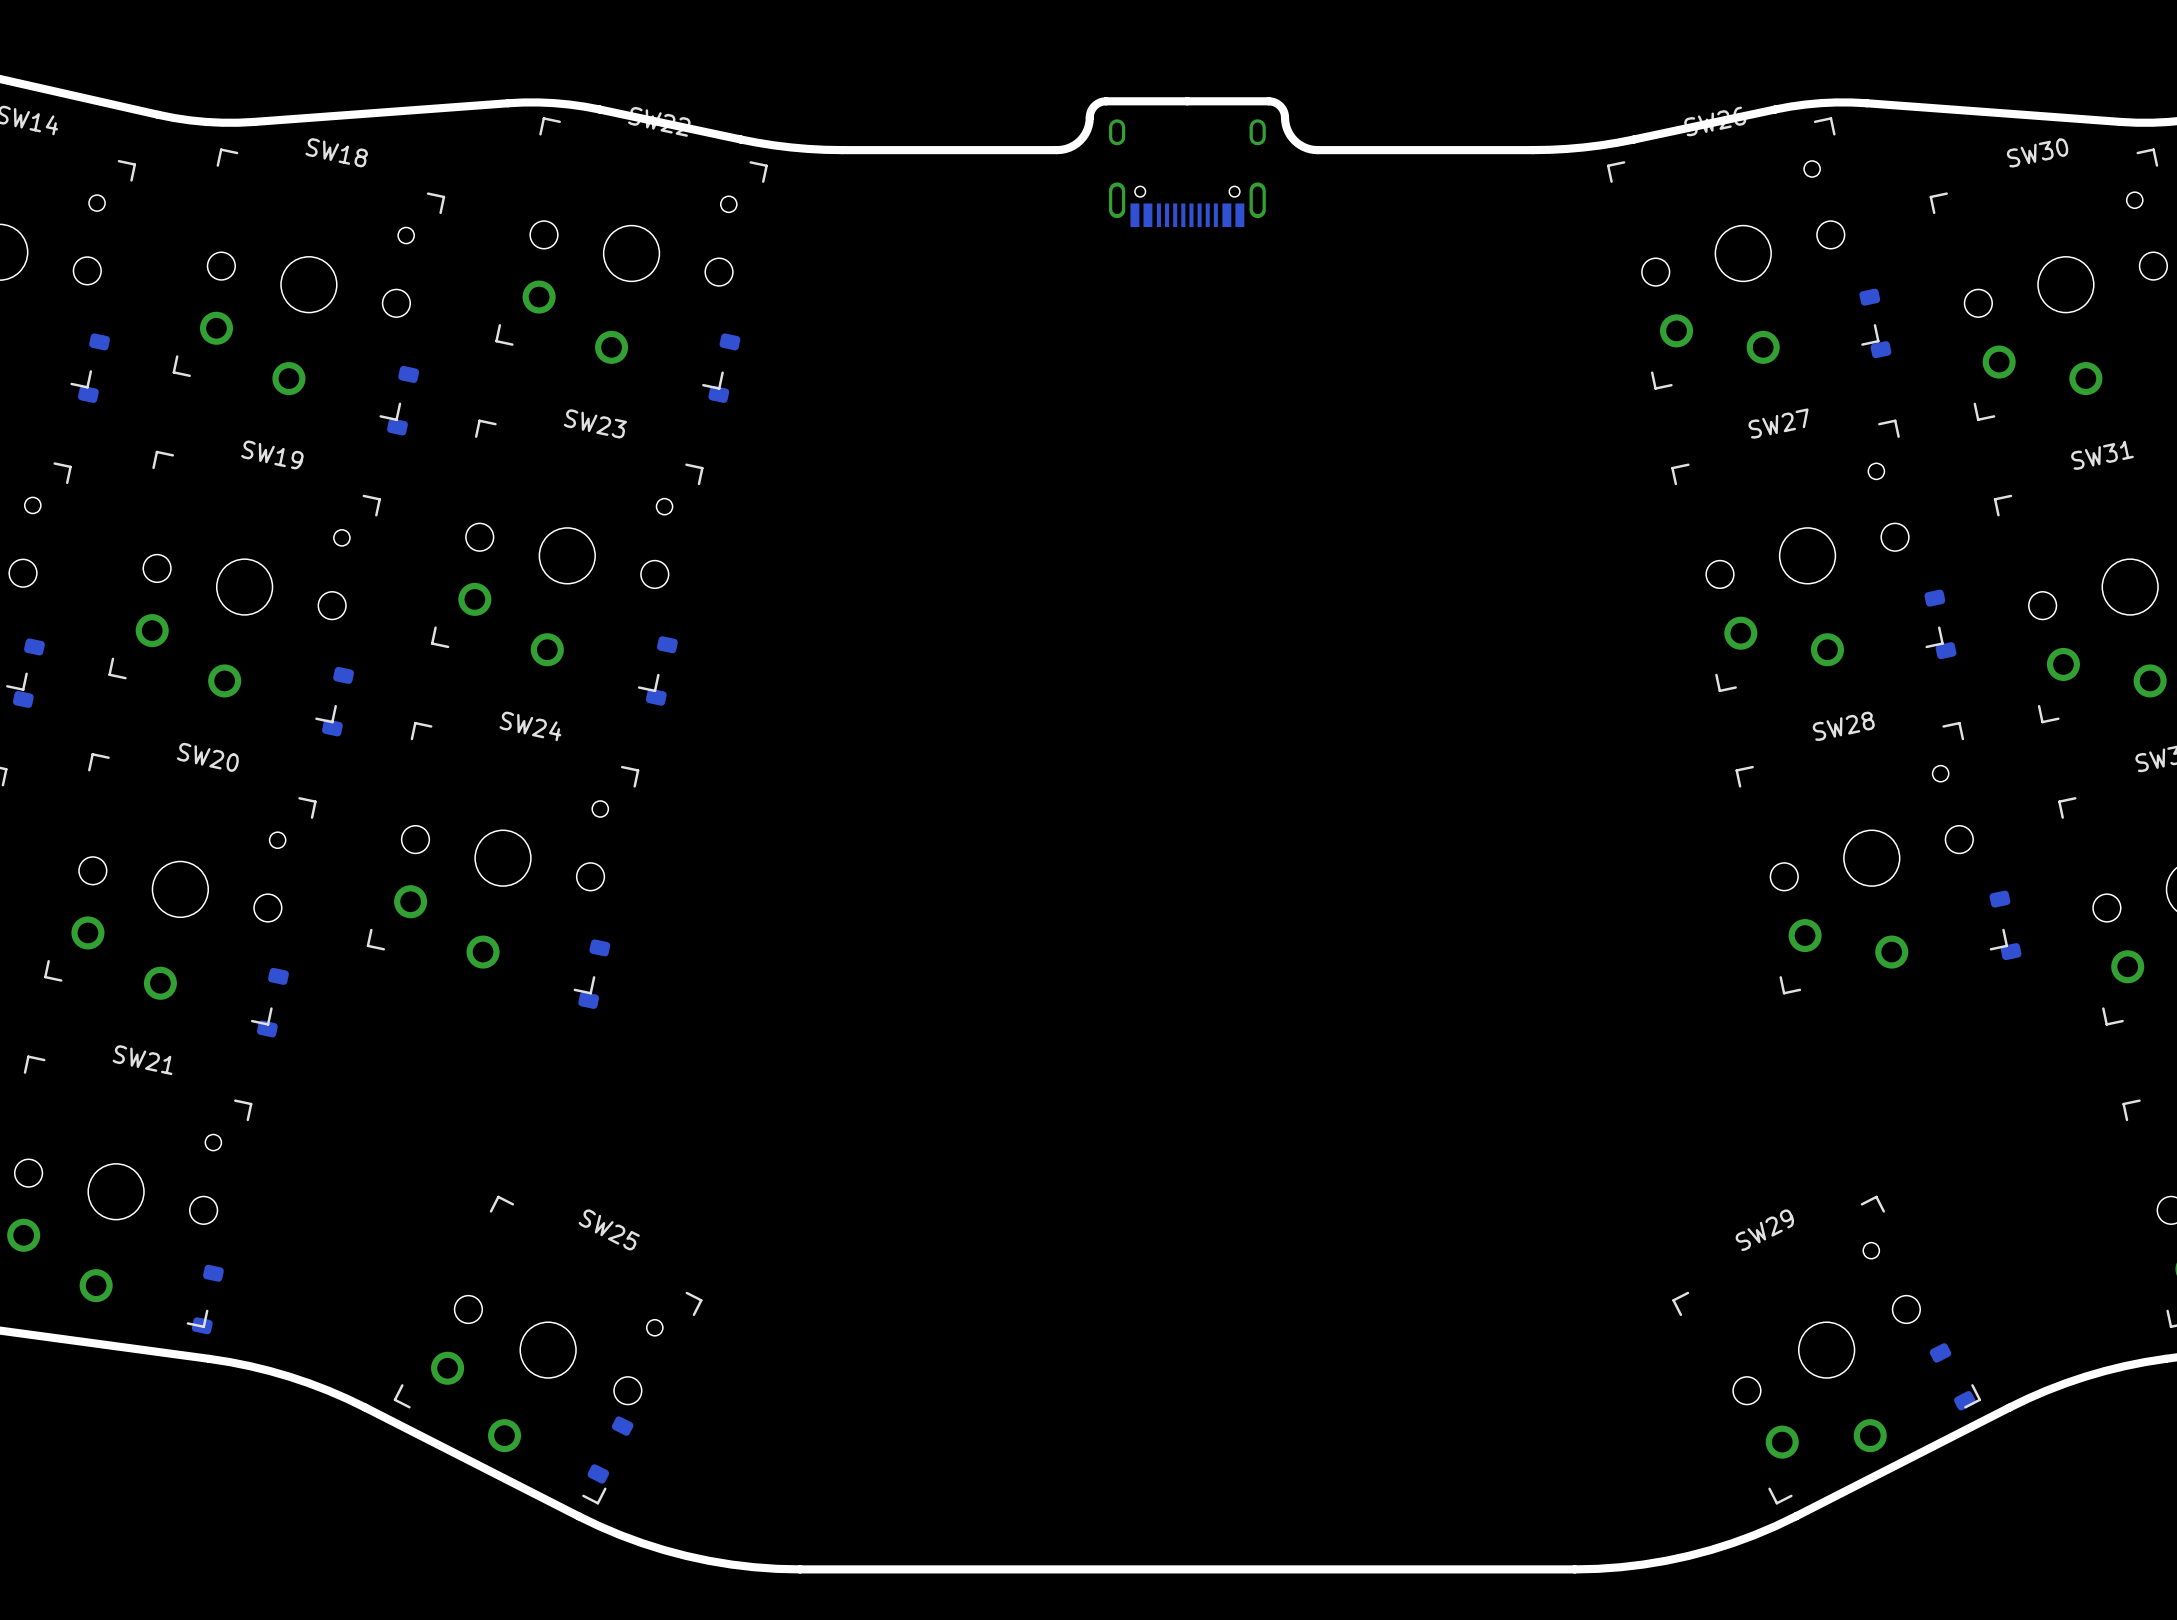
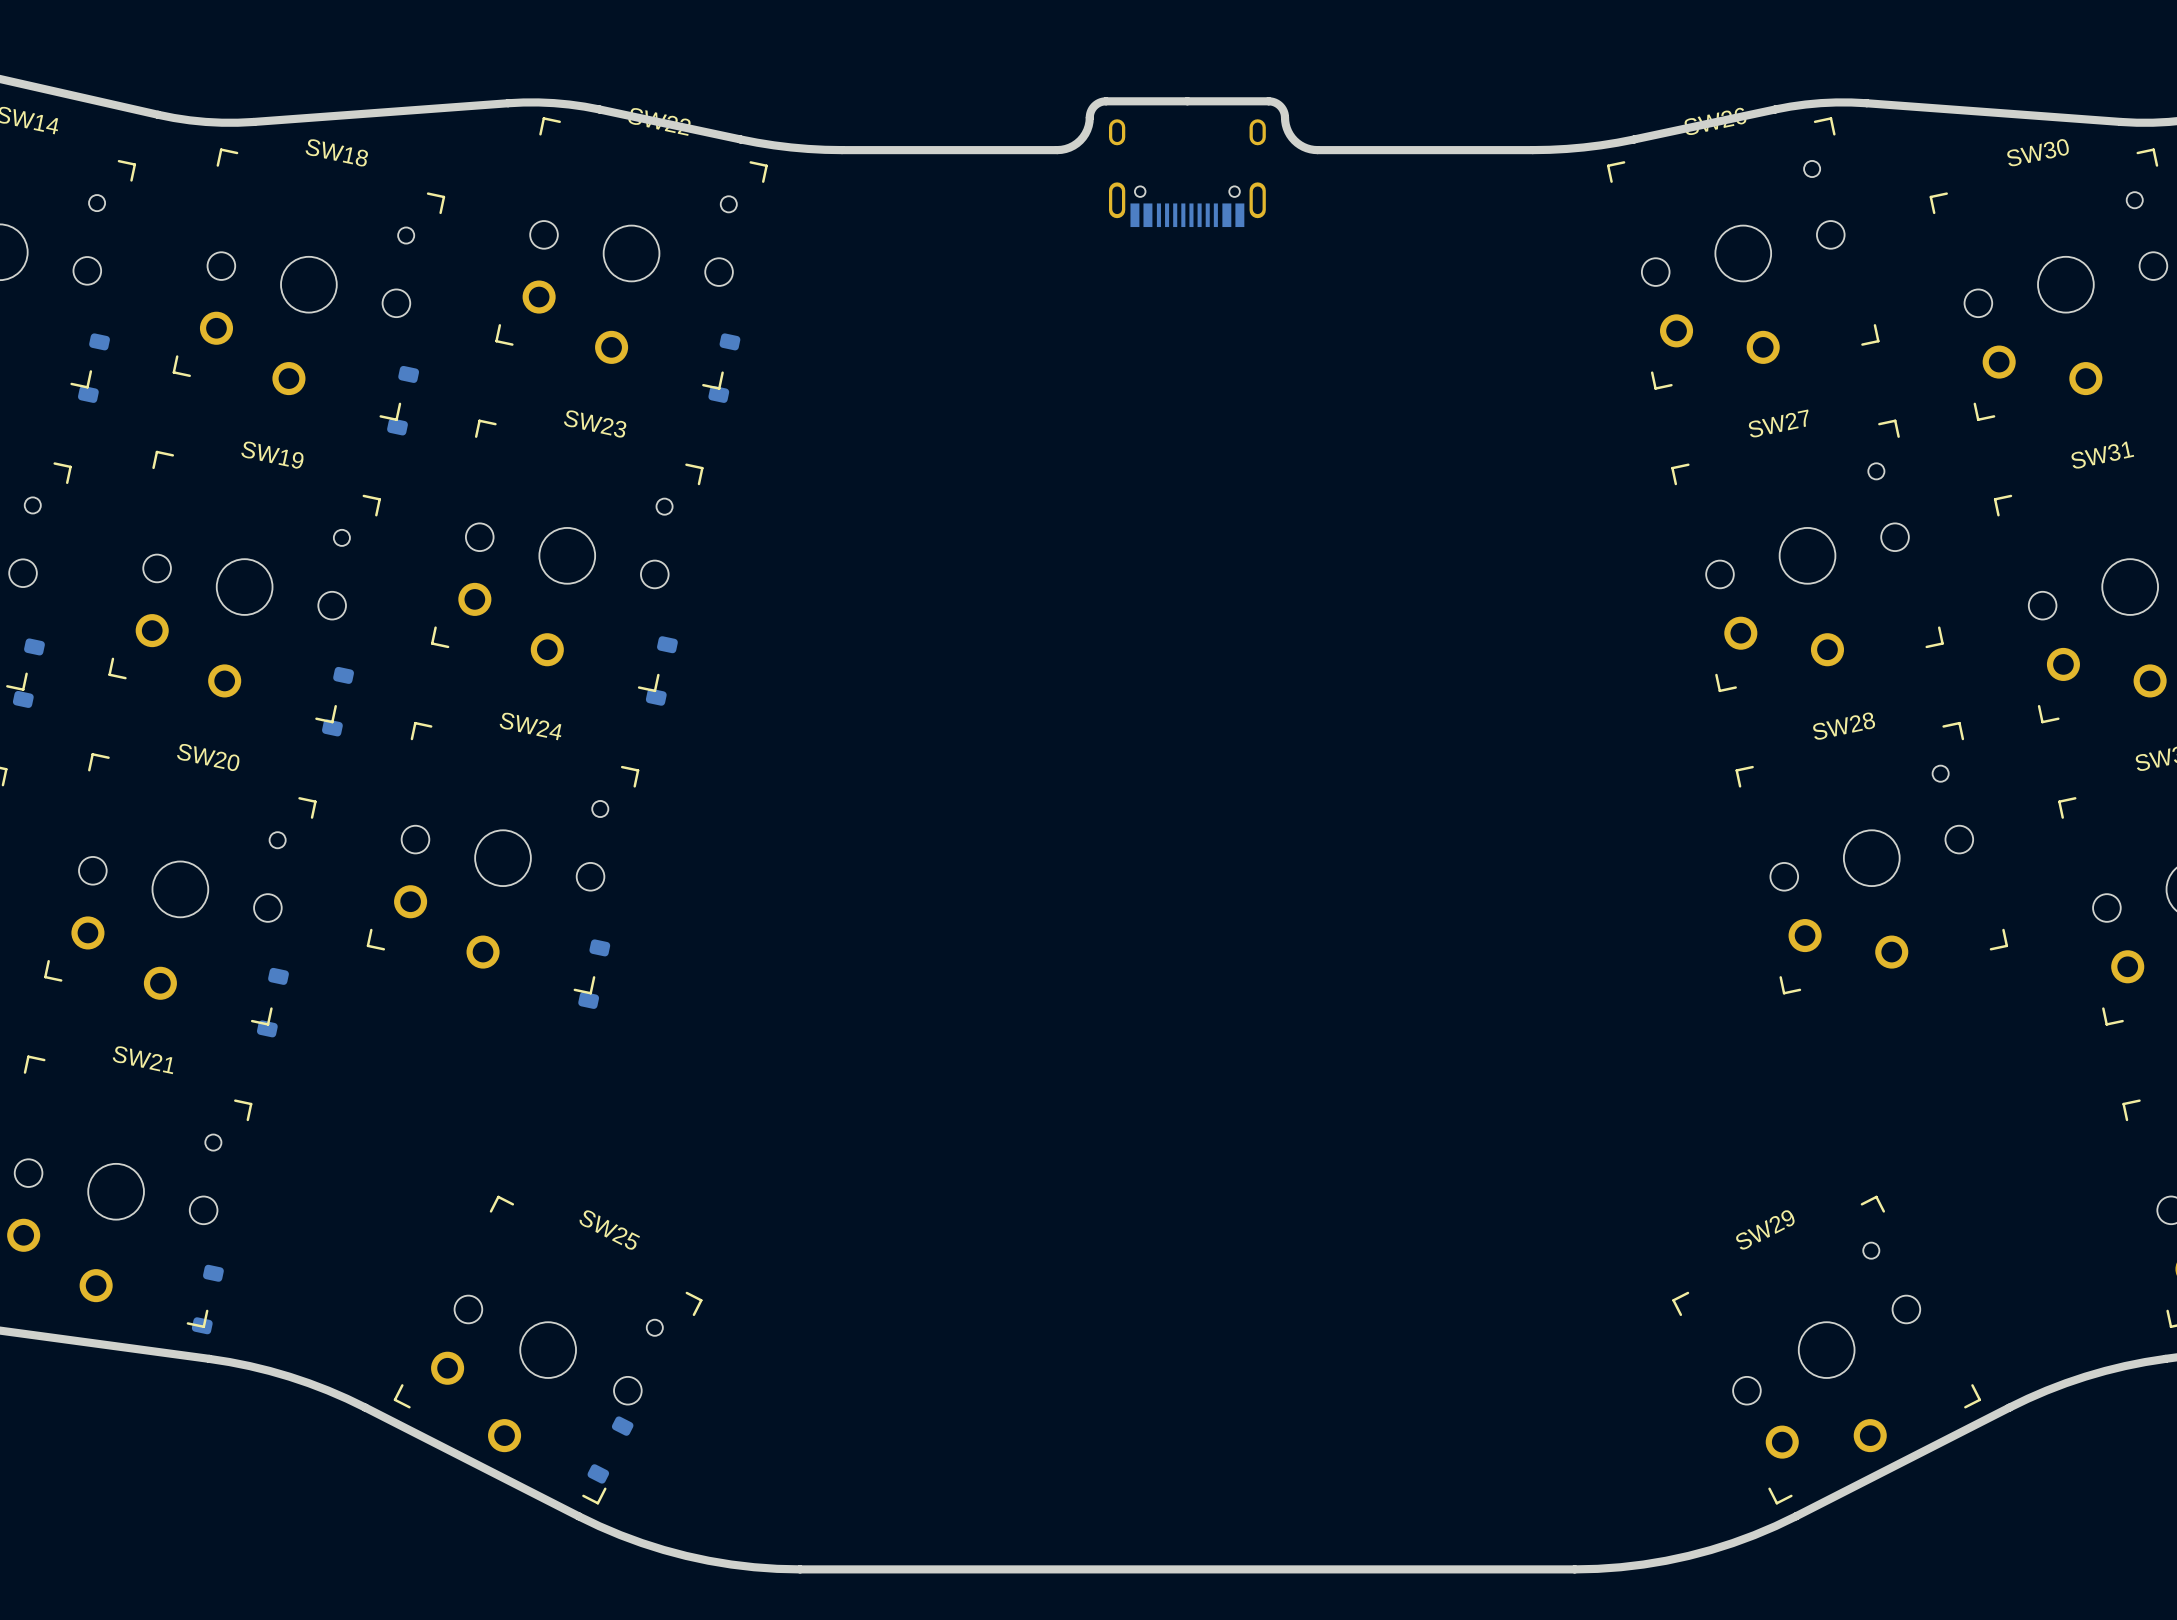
part: (1875, 323) -> none
part: (1940, 624) -> none
part: (2005, 925) -> none
part: (1952, 1376) -> none

